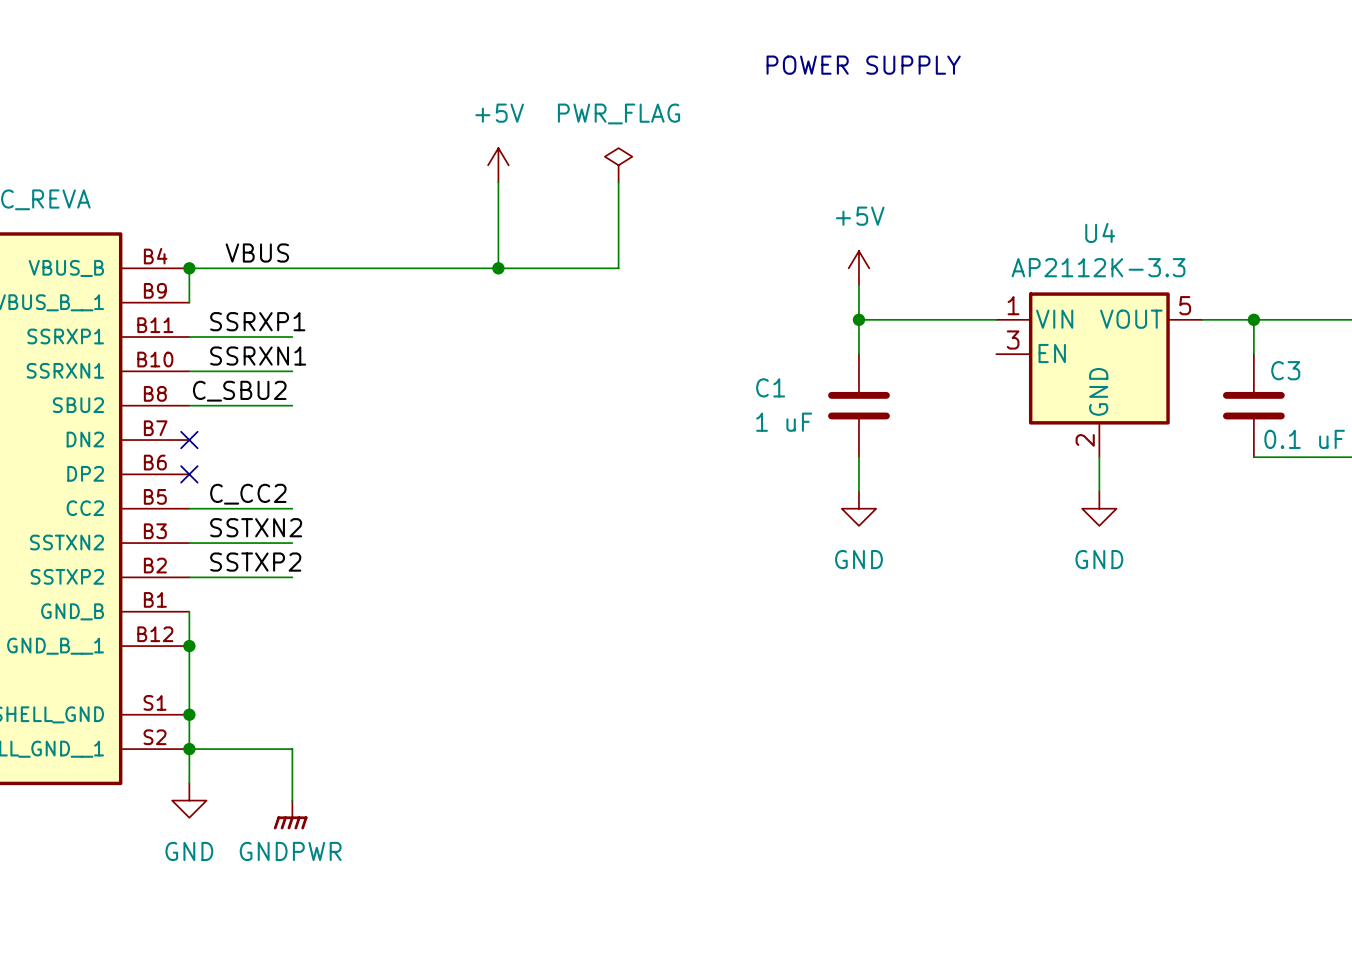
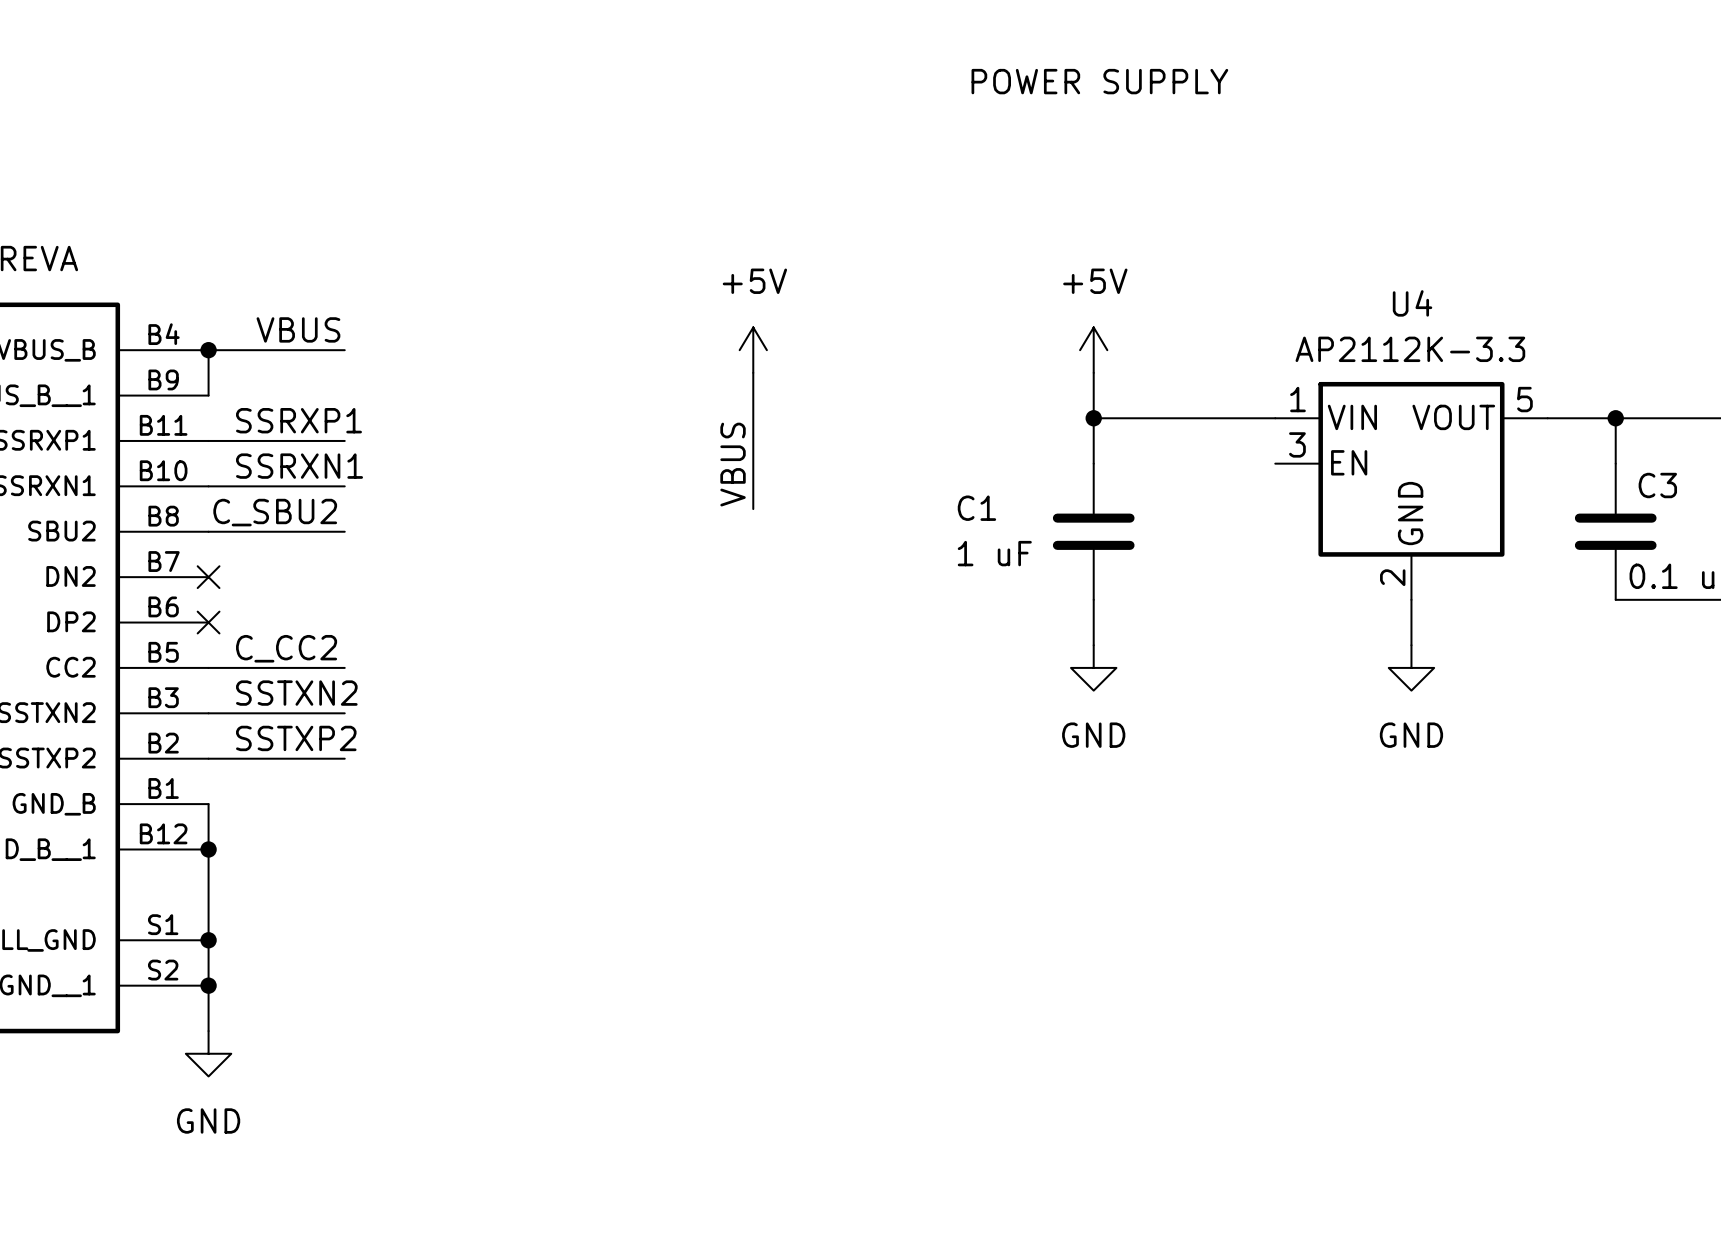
power symbol position: +5V (498, 165) -> +5V (753, 350)
power symbol: PWR_FLAG (618, 165) -> none
wire: (498, 182) (498, 268) -> none
wire: (618, 182) (618, 268) (292, 268) -> none
junction: (498, 268) -> none
wire: none -> (753, 372) (753, 509)
label: none -> VBUS (733, 464)
wire: (189, 749) (292, 749) (292, 800) -> none
power symbol: GNDPWR (290, 815) -> none

